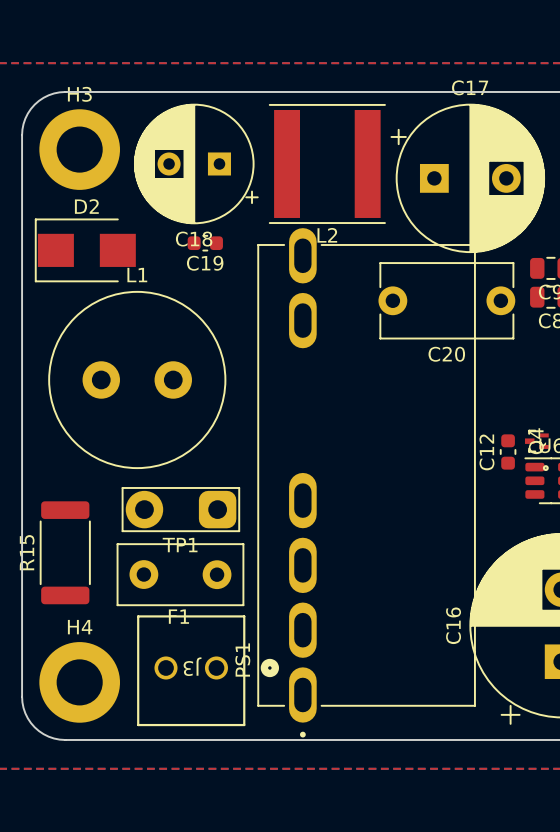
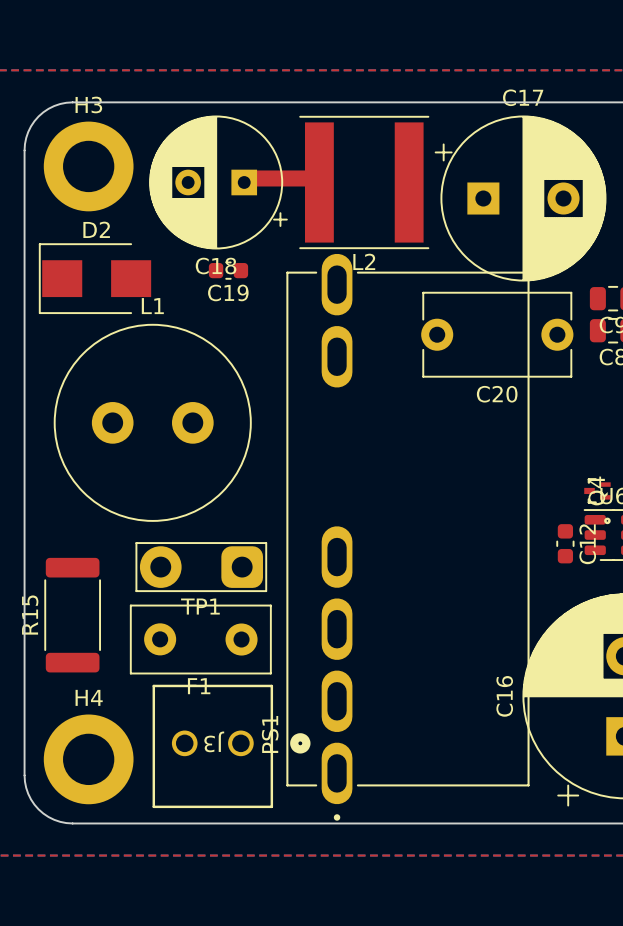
top track: none -> (319, 178) (248, 178) (244, 182)
C12 position: (508, 451) -> (565, 543)
C12 name position: C12 (486, 452) -> C12 (587, 544)

